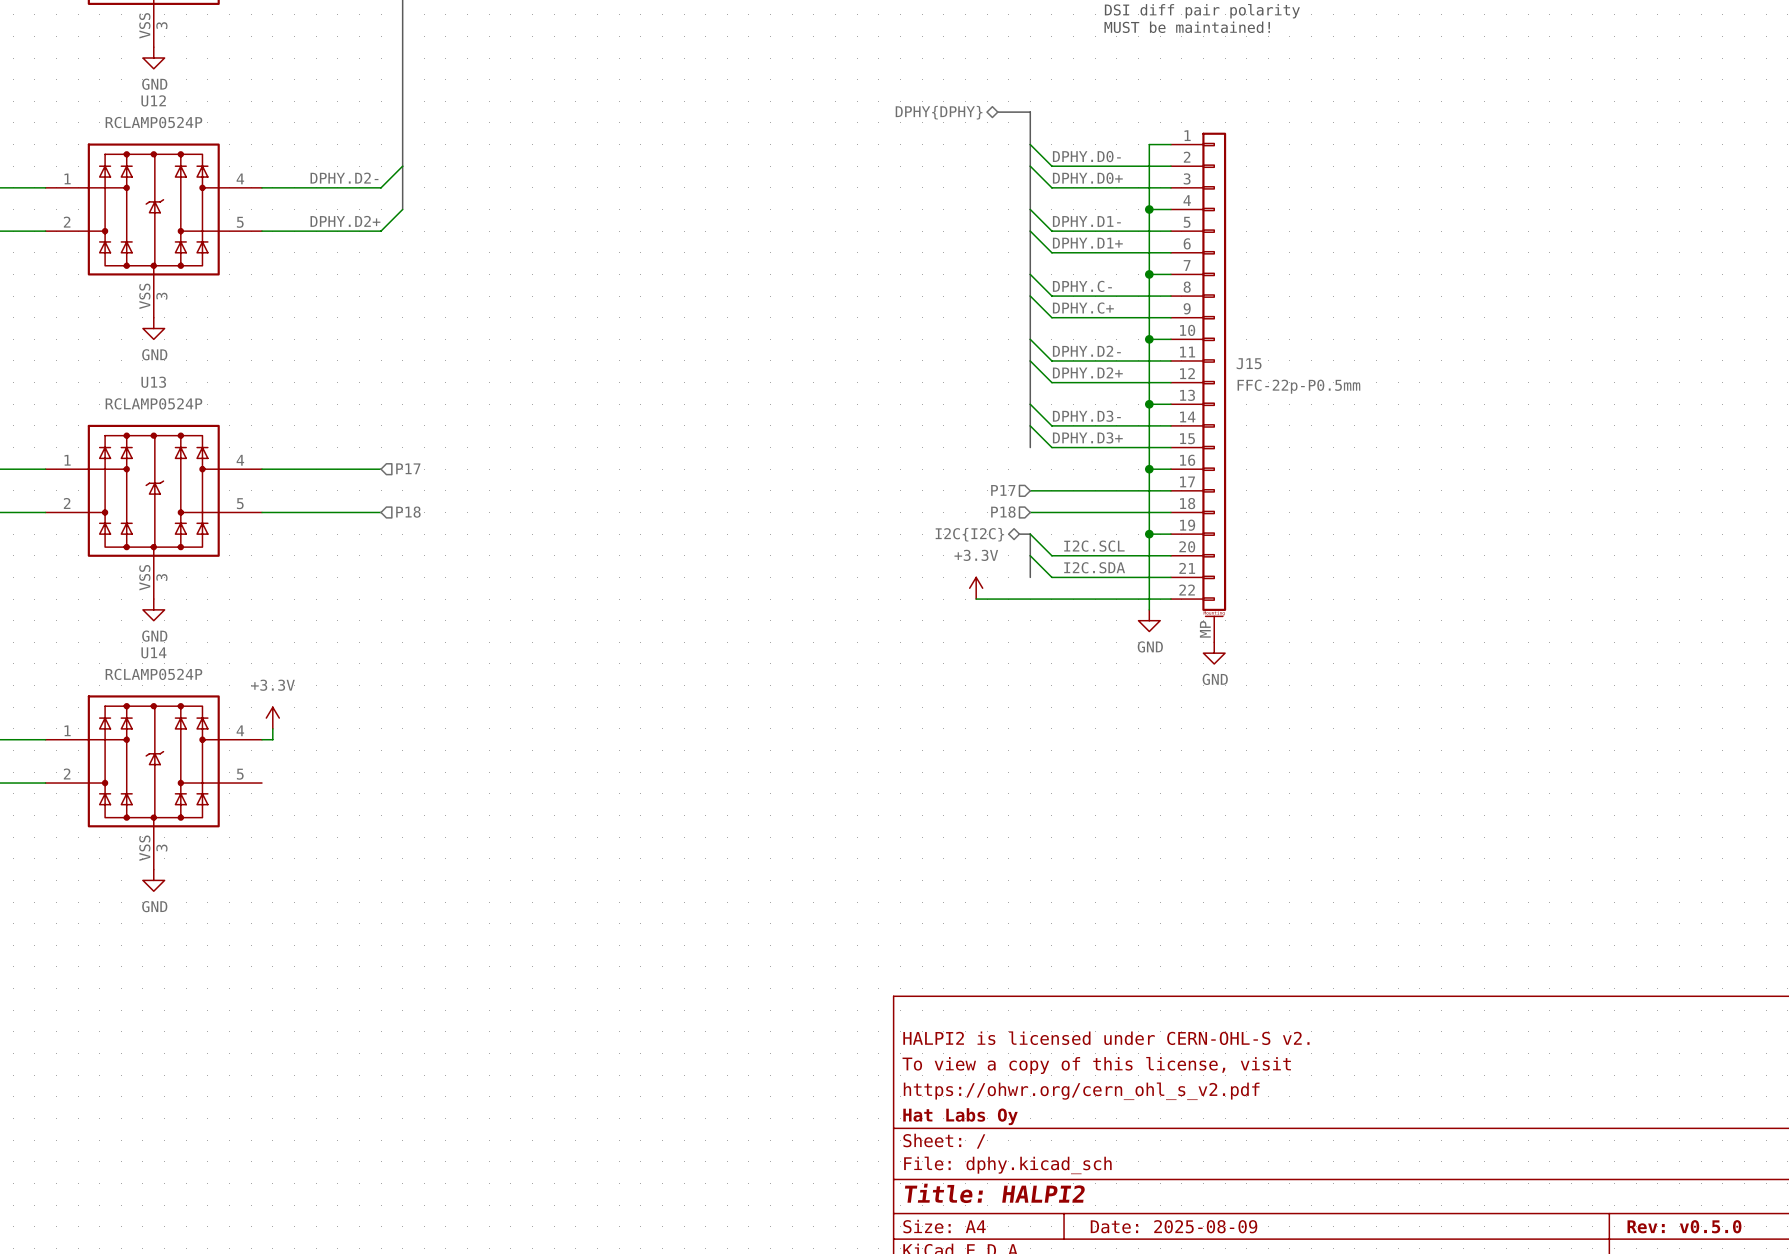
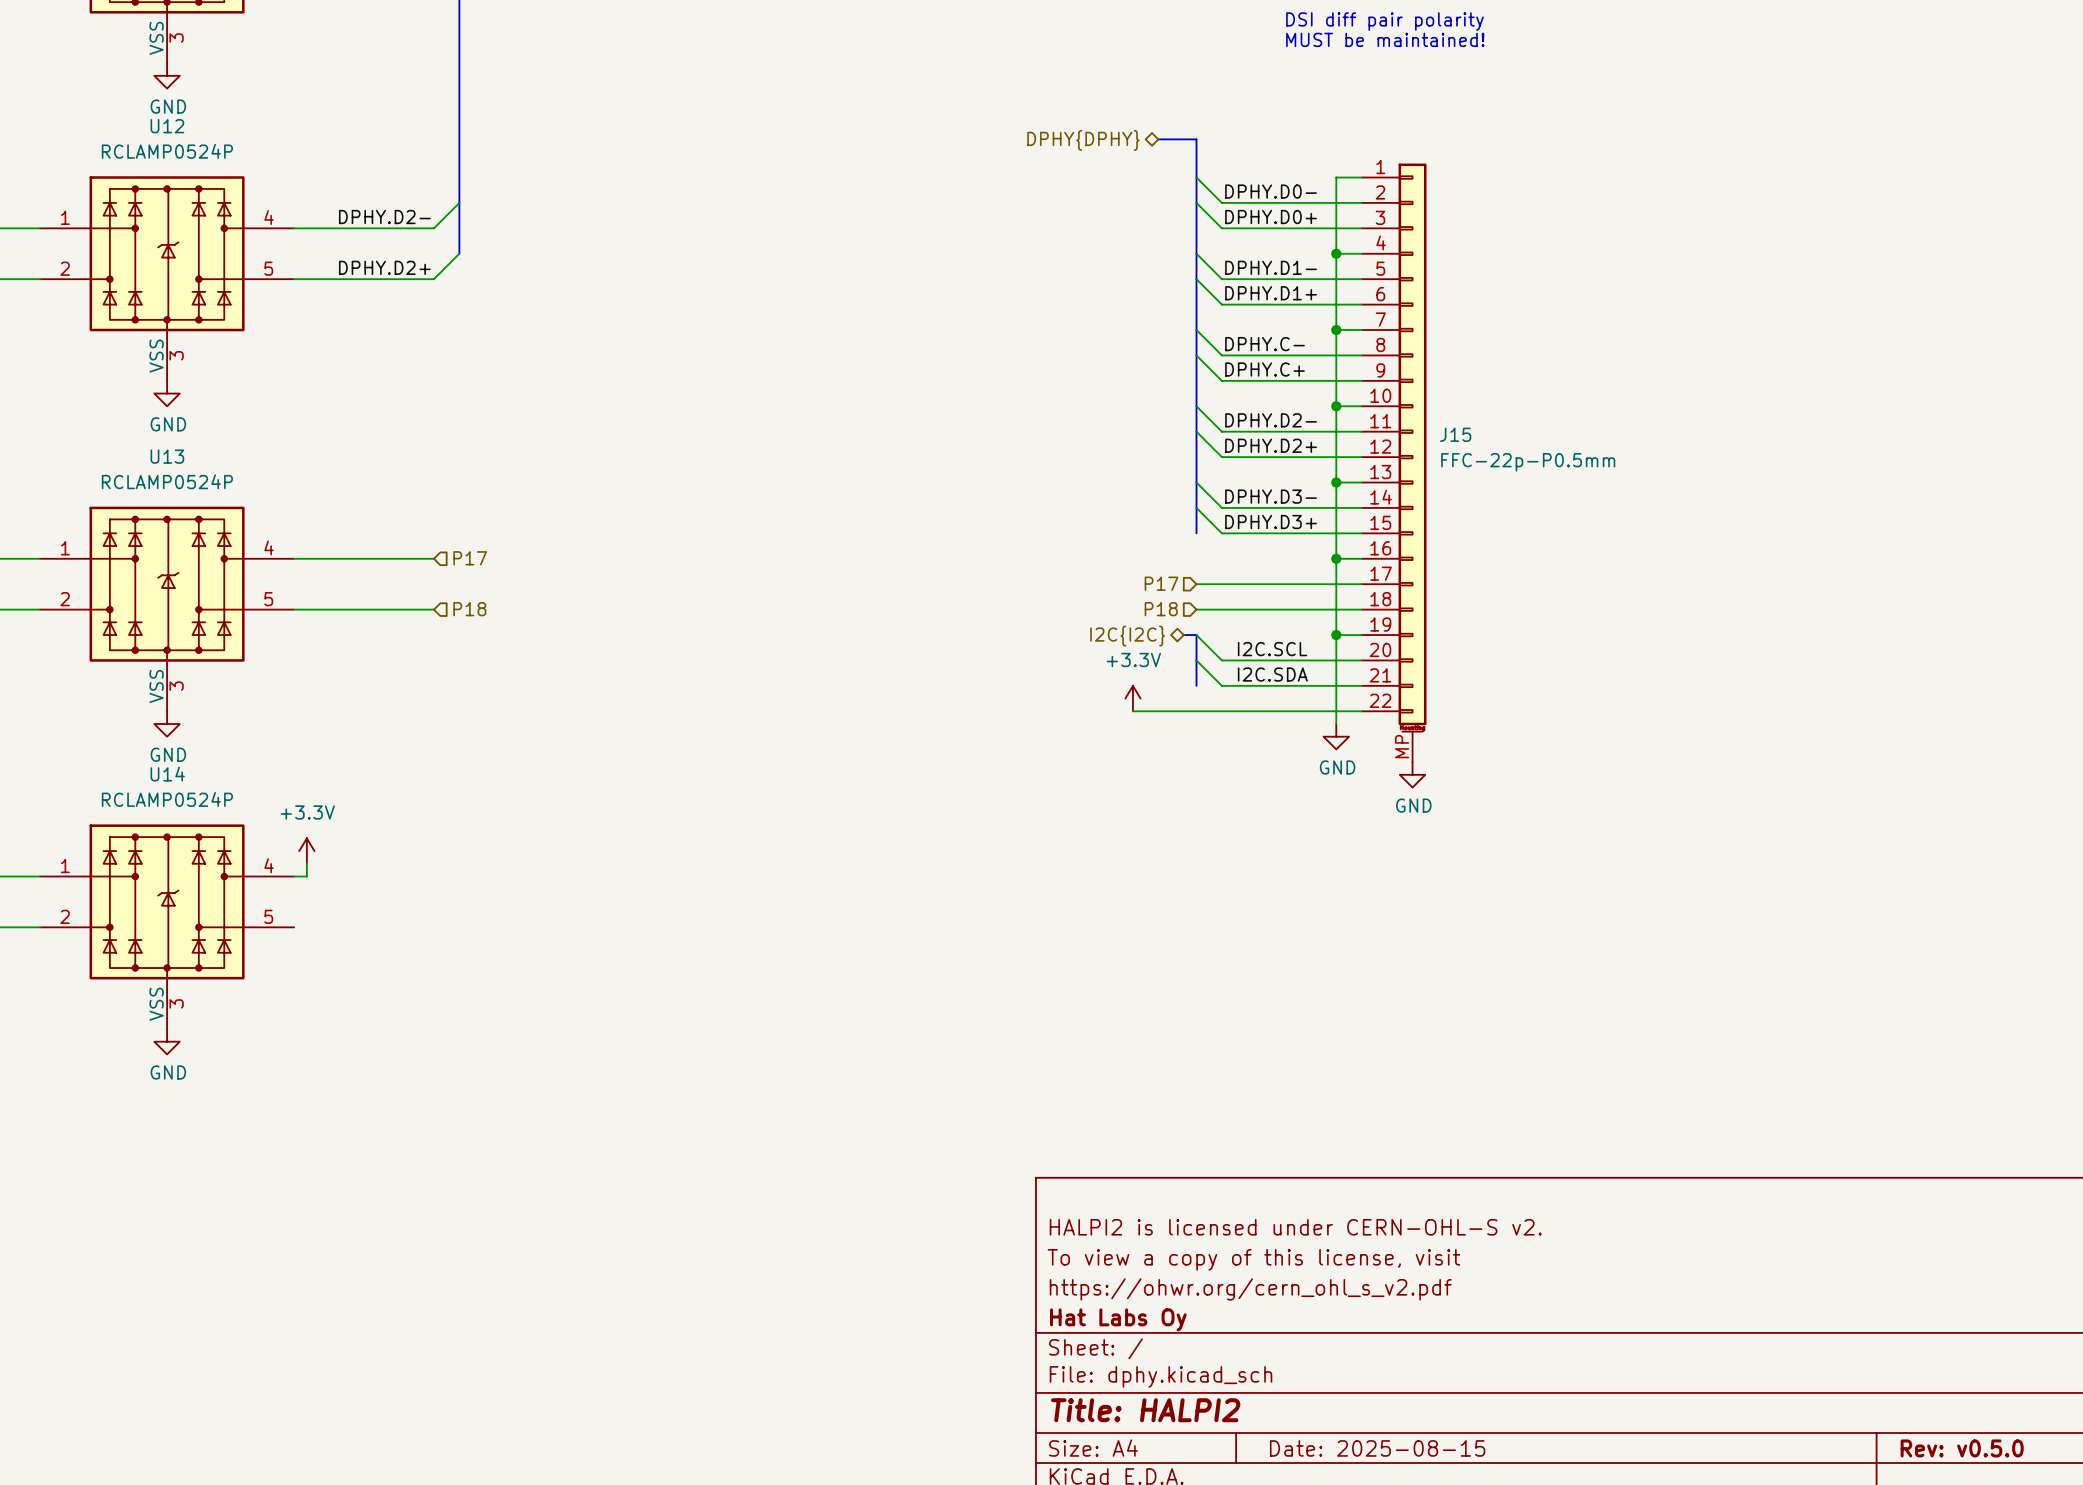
title block: Date: 2025-08-09 (1174, 1226) -> Date: 2025-08-15 (1377, 1448)

